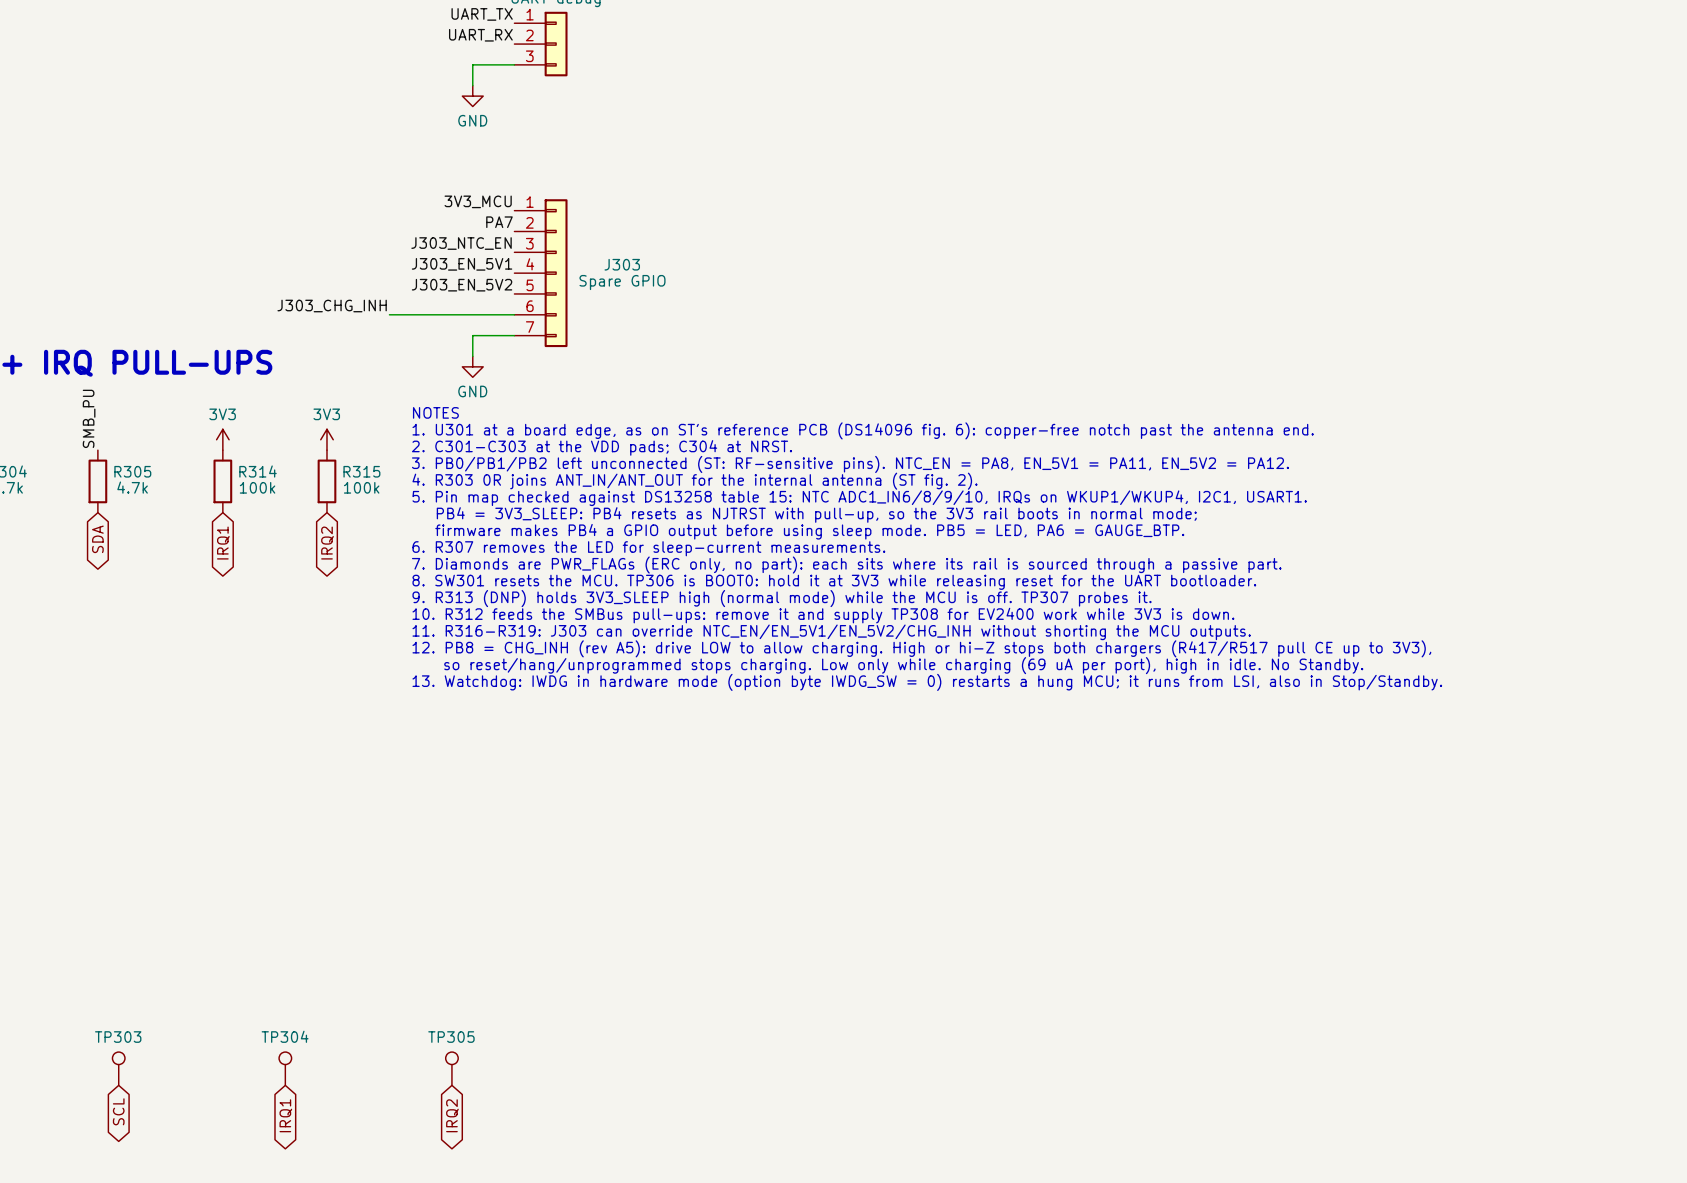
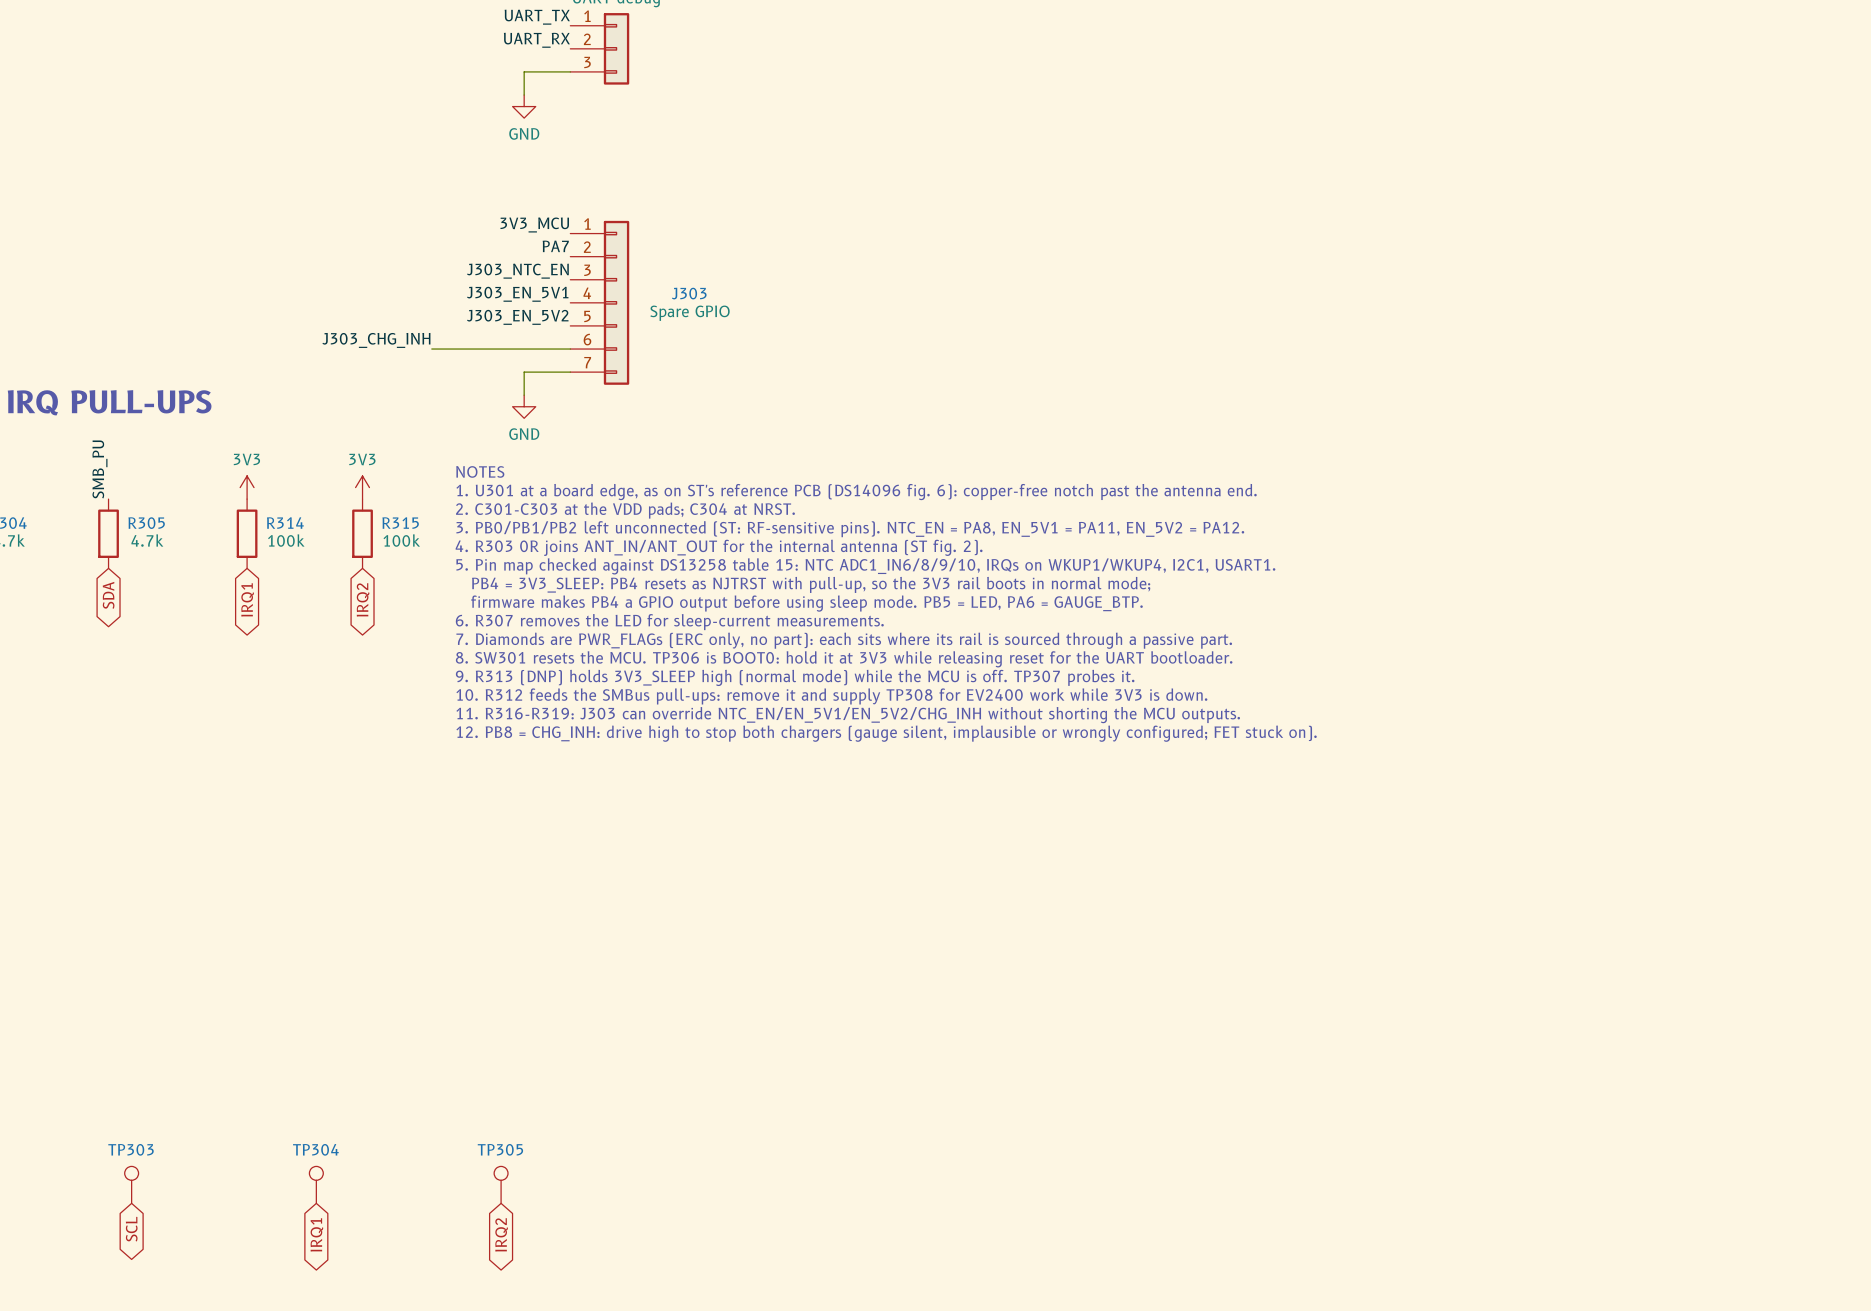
text position: NOTES (435, 412) -> NOTES (480, 471)
text position: 1. U301 at a board edge, as on ST's reference PCB (DS14096 fig. 6): copper-free notch past the antenna end. (863, 430) -> 1. U301 at a board edge, as on ST's reference PCB (DS14096 fig. 6): copper-free notch past the antenna end. (856, 492)
text position: 2. C301-C303 at the VDD pads; C304 at NRST. (602, 447) -> 2. C301-C303 at the VDD pads; C304 at NRST. (625, 510)
text position: 3. PB0/PB1/PB2 left unconnected (ST: RF-sensitive pins). NTC_EN = PA8, EN_5V1 = PA11, EN_5V2 = PA12. (850, 464) -> 3. PB0/PB1/PB2 left unconnected (ST: RF-sensitive pins). NTC_EN = PA8, EN_5V1 = PA11, EN_5V2 = PA12. (850, 529)
text position: 4. R303 0R joins ANT_IN/ANT_OUT for the internal antenna (ST fig. 2). (695, 481) -> 4. R303 0R joins ANT_IN/ANT_OUT for the internal antenna (ST fig. 2). (719, 547)
text position: 5. Pin map checked against DS13258 table 15: NTC ADC1_IN6/8/9/10, IRQs on WKUP1/WKUP4, I2C1, USART1. (859, 498) -> 5. Pin map checked against DS13258 table 15: NTC ADC1_IN6/8/9/10, IRQs on WKUP1/WKUP4, I2C1, USART1. (865, 566)
text position: PB4 = 3V3_SLEEP: PB4 resets as NJTRST with pull-up, so the 3V3 rail boots in normal mode; (816, 514) -> PB4 = 3V3_SLEEP: PB4 resets as NJTRST with pull-up, so the 3V3 rail boots in normal mode; (811, 584)
text position: firmware makes PB4 a GPIO output before using sleep mode. PB5 = LED, PA6 = GAUGE_BTP. (809, 531) -> firmware makes PB4 a GPIO output before using sleep mode. PB5 = LED, PA6 = GAUGE_BTP. (807, 603)
text position: 6. R307 removes the LED for sleep-current measurements. (648, 548) -> 6. R307 removes the LED for sleep-current measurements. (669, 622)
text position: 7. Diamonds are PWR_FLAGs (ERC only, no part): each sits where its rail is sourced through a passive part. (846, 565) -> 7. Diamonds are PWR_FLAGs (ERC only, no part): each sits where its rail is sourced through a passive part. (844, 640)
text position: 8. SW301 resets the MCU. TP306 is BOOT0: hold it at 3V3 while releasing reset for the UART bootloader. (834, 582) -> 8. SW301 resets the MCU. TP306 is BOOT0: hold it at 3V3 while releasing reset for the UART bootloader. (844, 659)
text position: 9. R313 (DNP) holds 3V3_SLEEP high (normal mode) while the MCU is off. TP307 probes it. (782, 598) -> 9. R313 (DNP) holds 3V3_SLEEP high (normal mode) while the MCU is off. TP307 probes it. (795, 677)
text position: 10. R312 feeds the SMBus pull-ups: remove it and supply TP308 for EV2400 work while 3V3 is down. (823, 615) -> 10. R312 feeds the SMBus pull-ups: remove it and supply TP308 for EV2400 work while 3V3 is down. (831, 696)
text position: 11. R316-R319: J303 can override NTC_EN/EN_5V1/EN_5V2/CHG_INH without shorting the MCU outputs. (831, 632) -> 11. R316-R319: J303 can override NTC_EN/EN_5V1/EN_5V2/CHG_INH without shorting the MCU outputs. (848, 715)
text: 12. PB8 = CHG_INH (rev A5): drive LOW to allow charging. High or hi-Z stops both chargers (R417/R517 pull CE up to 3V3), (921, 648) -> none
text: so reset/hang/unprogrammed stops charging. Low only while charging (69 uA per port), high in idle. No Standby. (903, 665) -> 12. PB8 = CHG_INH: drive high to stop both chargers (gauge silent, implausible or wrongly configured; FET stuck on). (886, 733)
text: 13. Watchdog: IWDG in hardware mode (option byte IWDG_SW = 0) restarts a hung MCU; it runs from LSI, also in Stop/Standby. (927, 682) -> none

